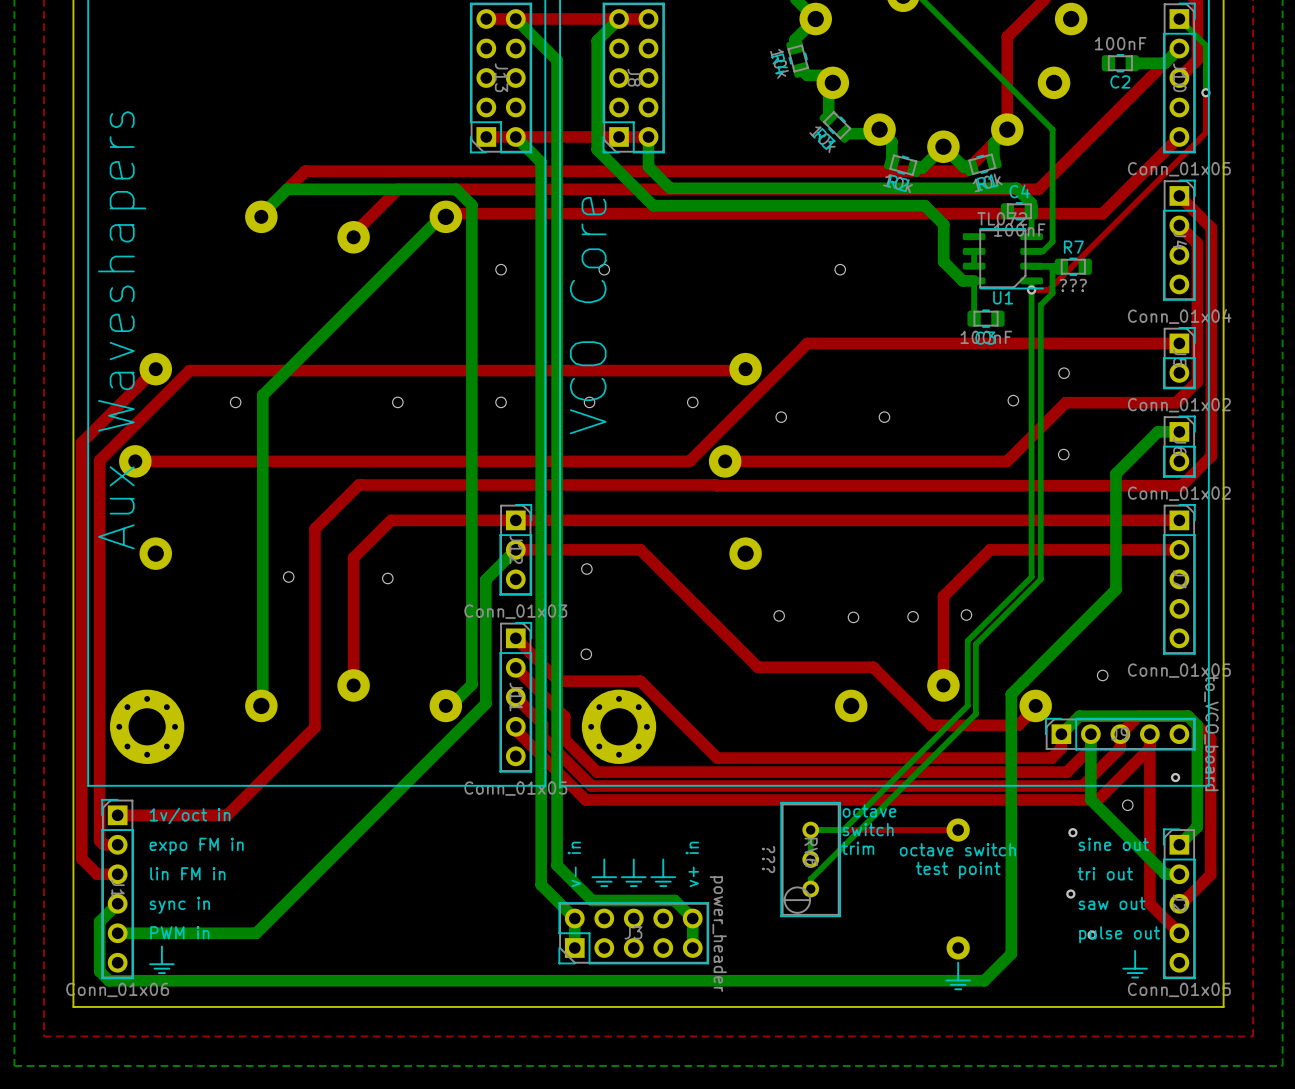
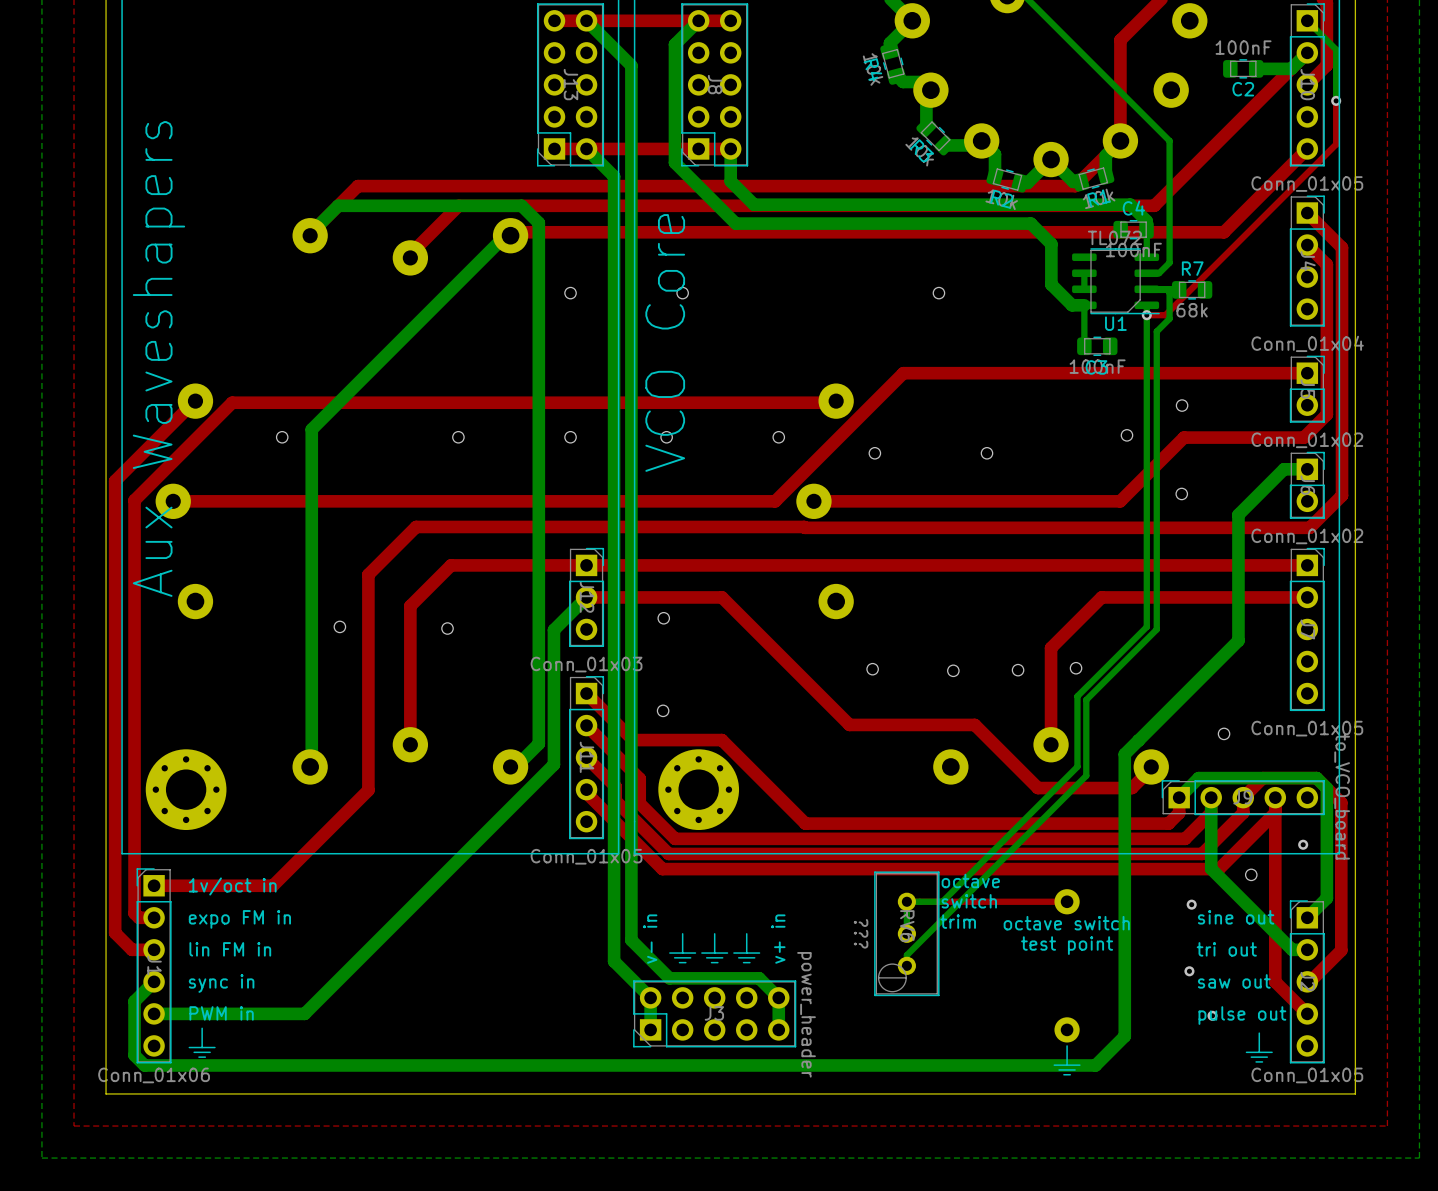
R7 value: ??? (1073, 285) -> 68k (1192, 310)

